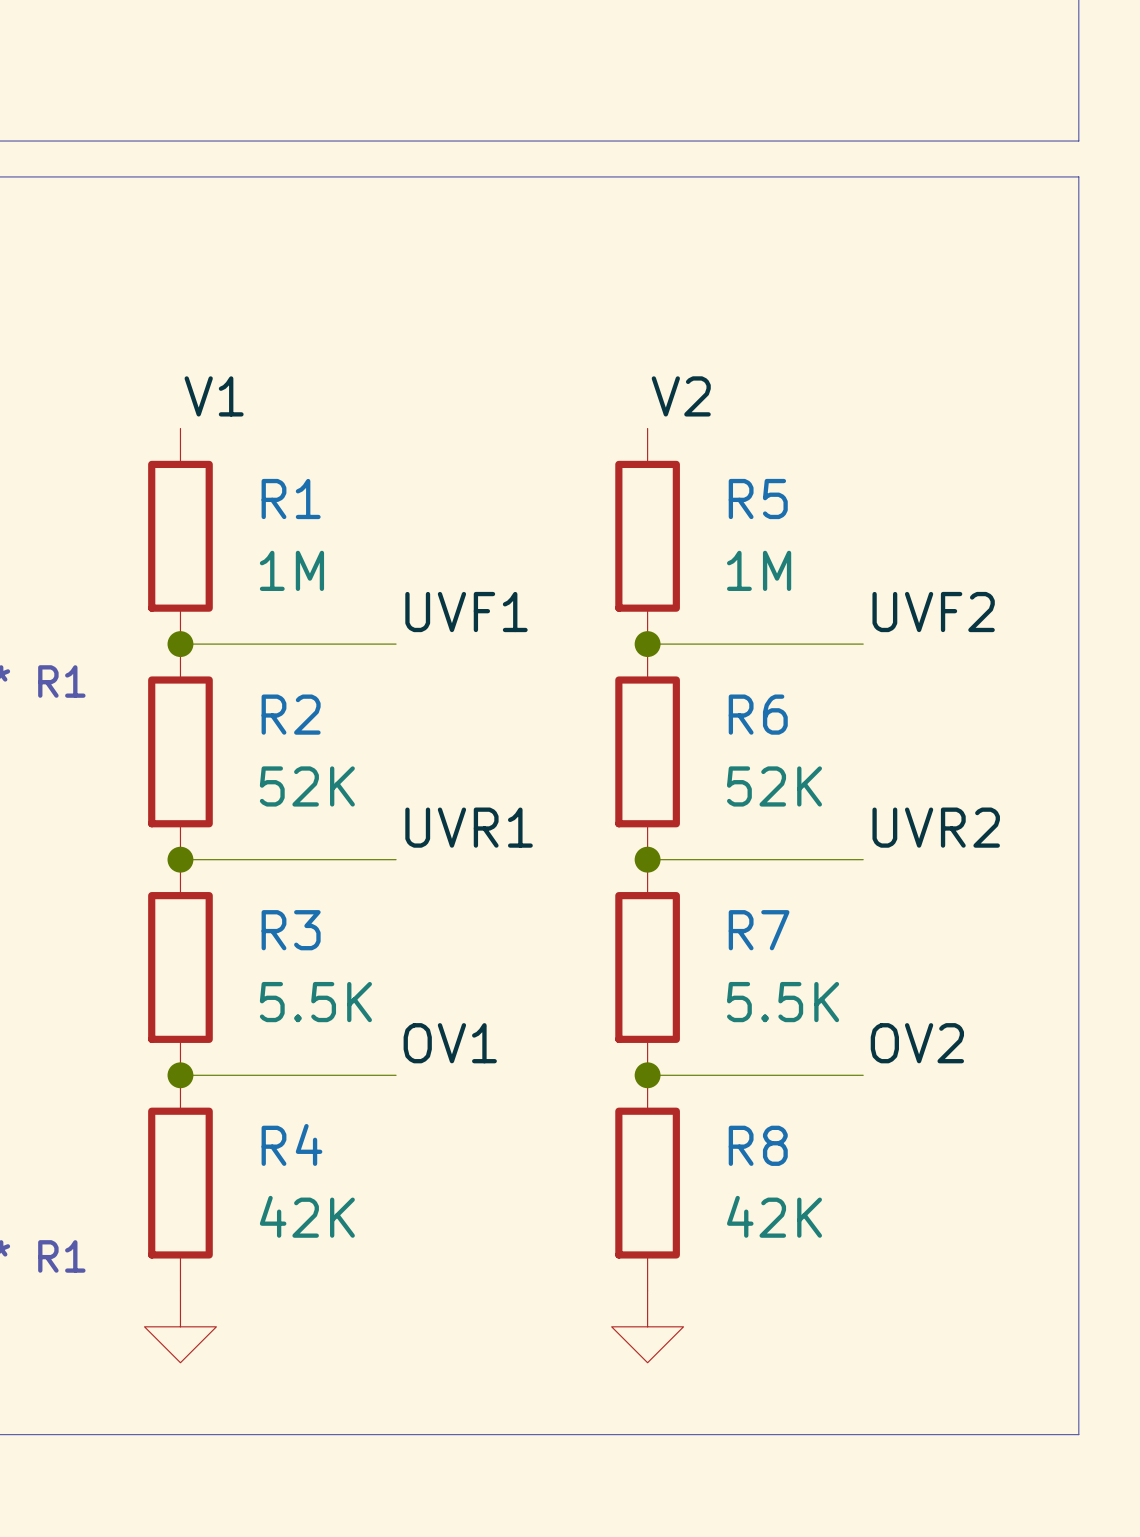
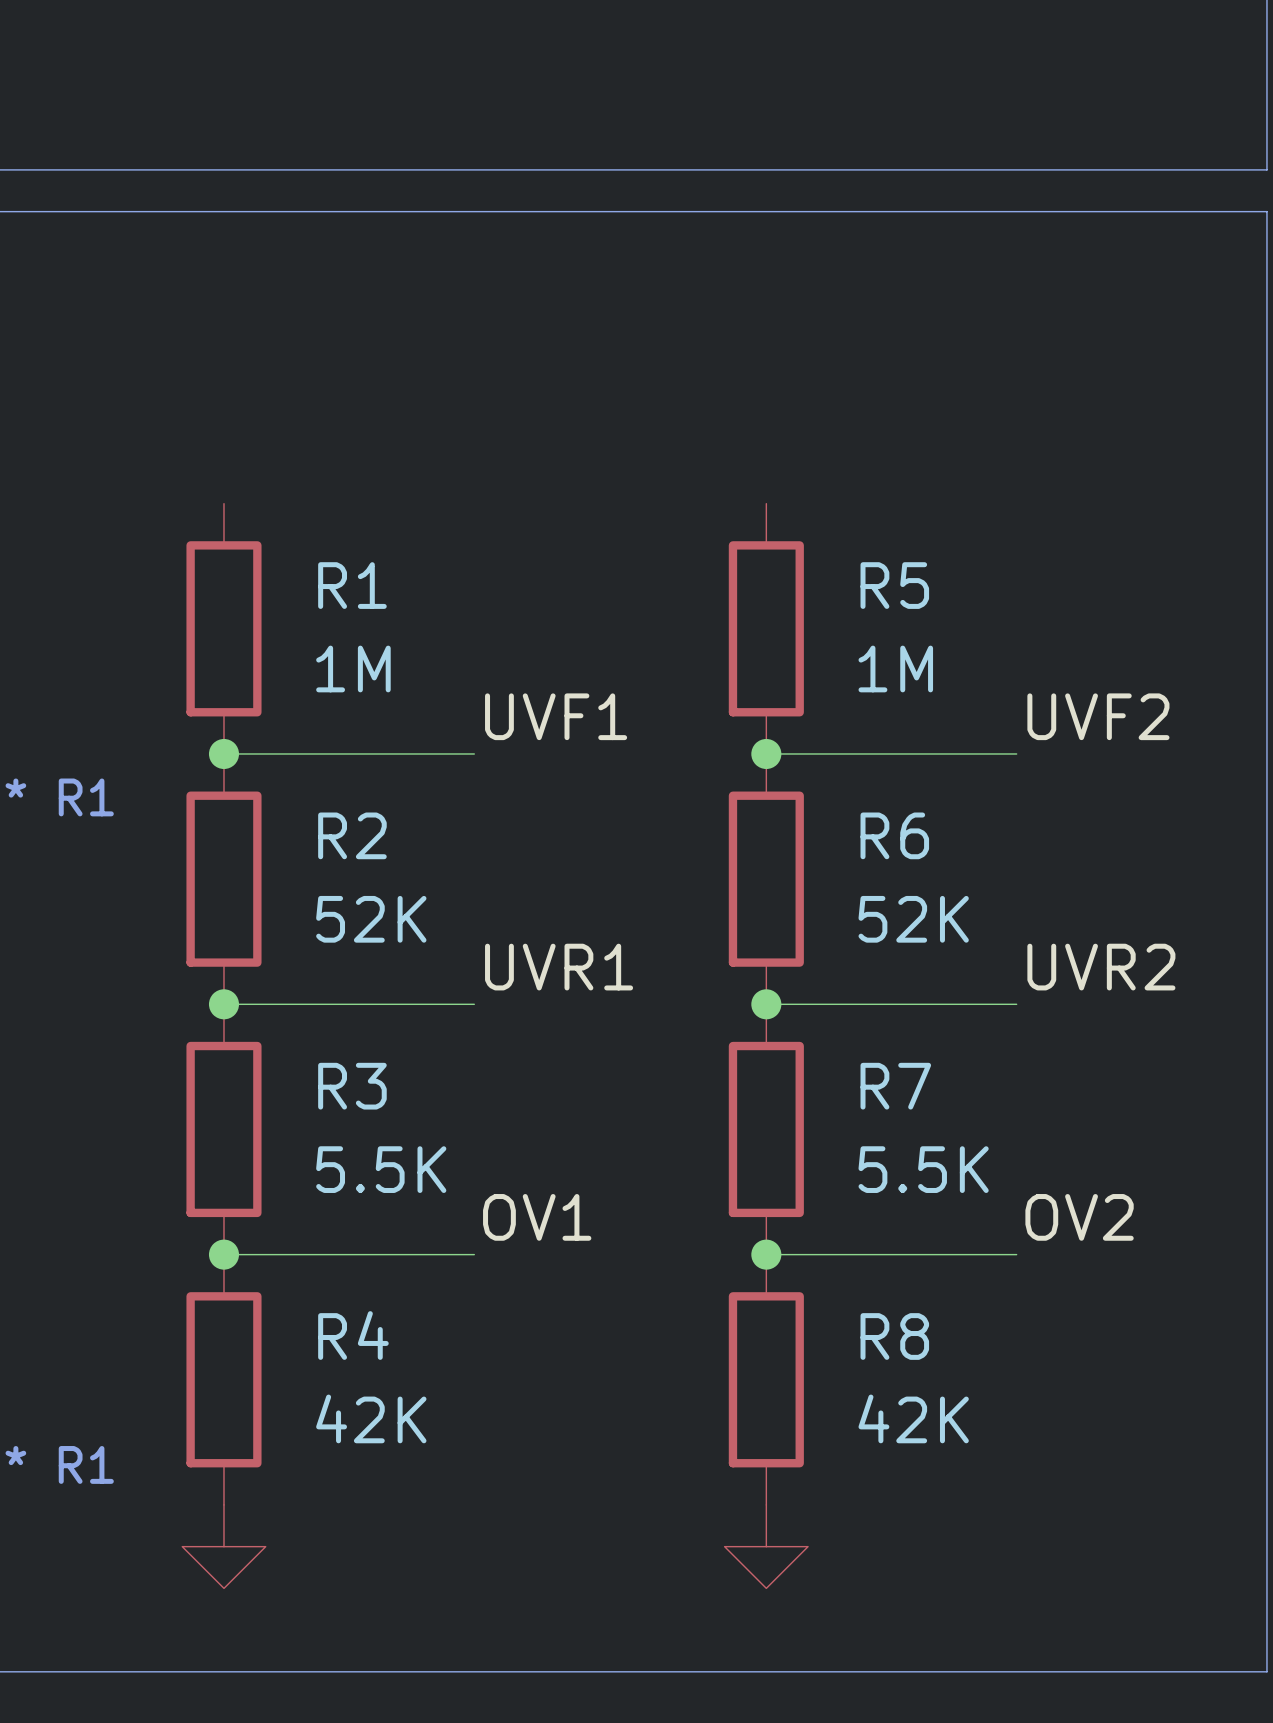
label: V1 (214, 396) -> none
label: V2 (681, 396) -> none

